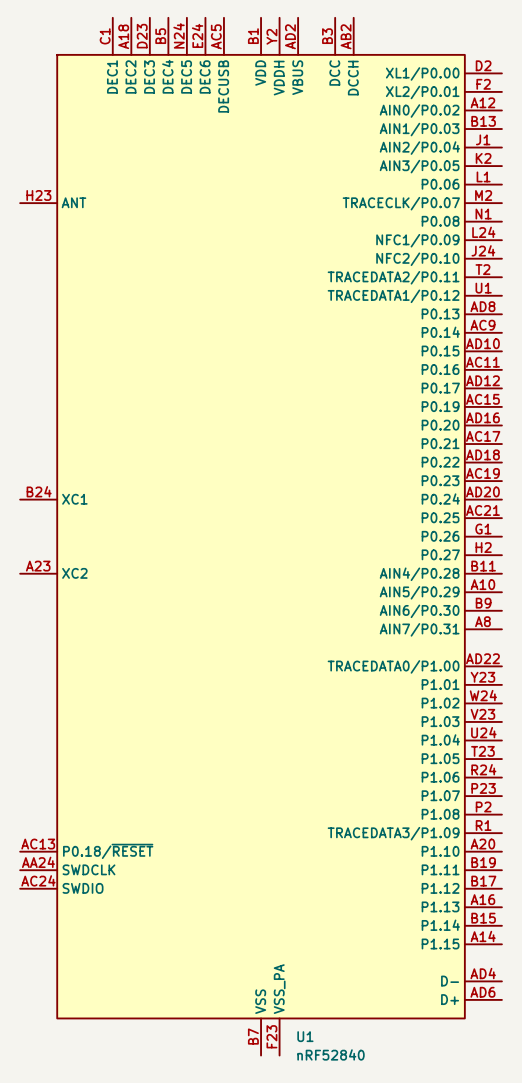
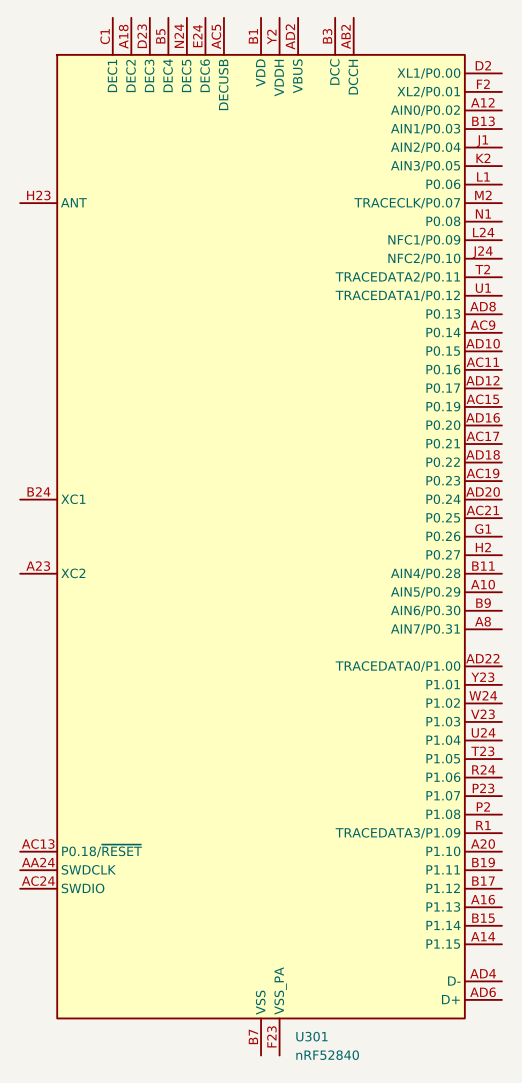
U1 name: U1 (305, 1036) -> U301 (311, 1036)

